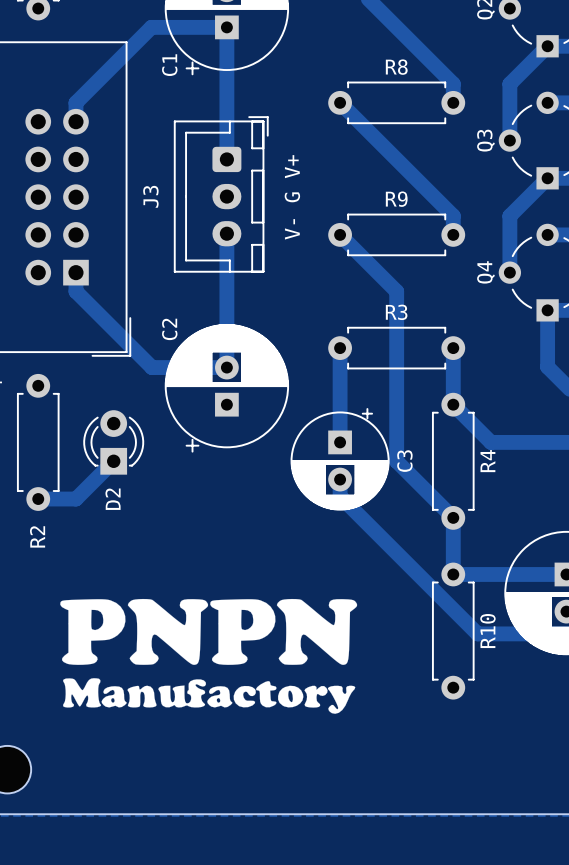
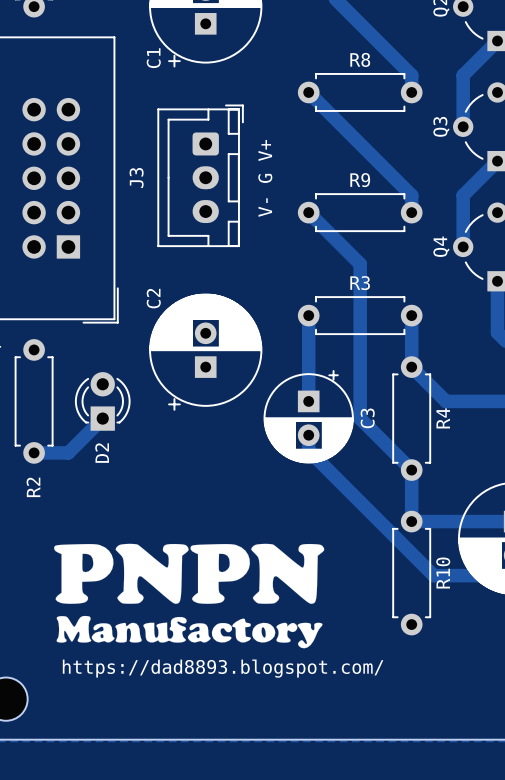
track: (75, 121) (75, 102) (151, 27) (226, 27) (226, 159) -> none
track: (226, 233) (226, 367) (152, 367) (75, 291) (75, 272) -> none
text: none -> https://dad8893.blogspot.com/ (223, 668)

